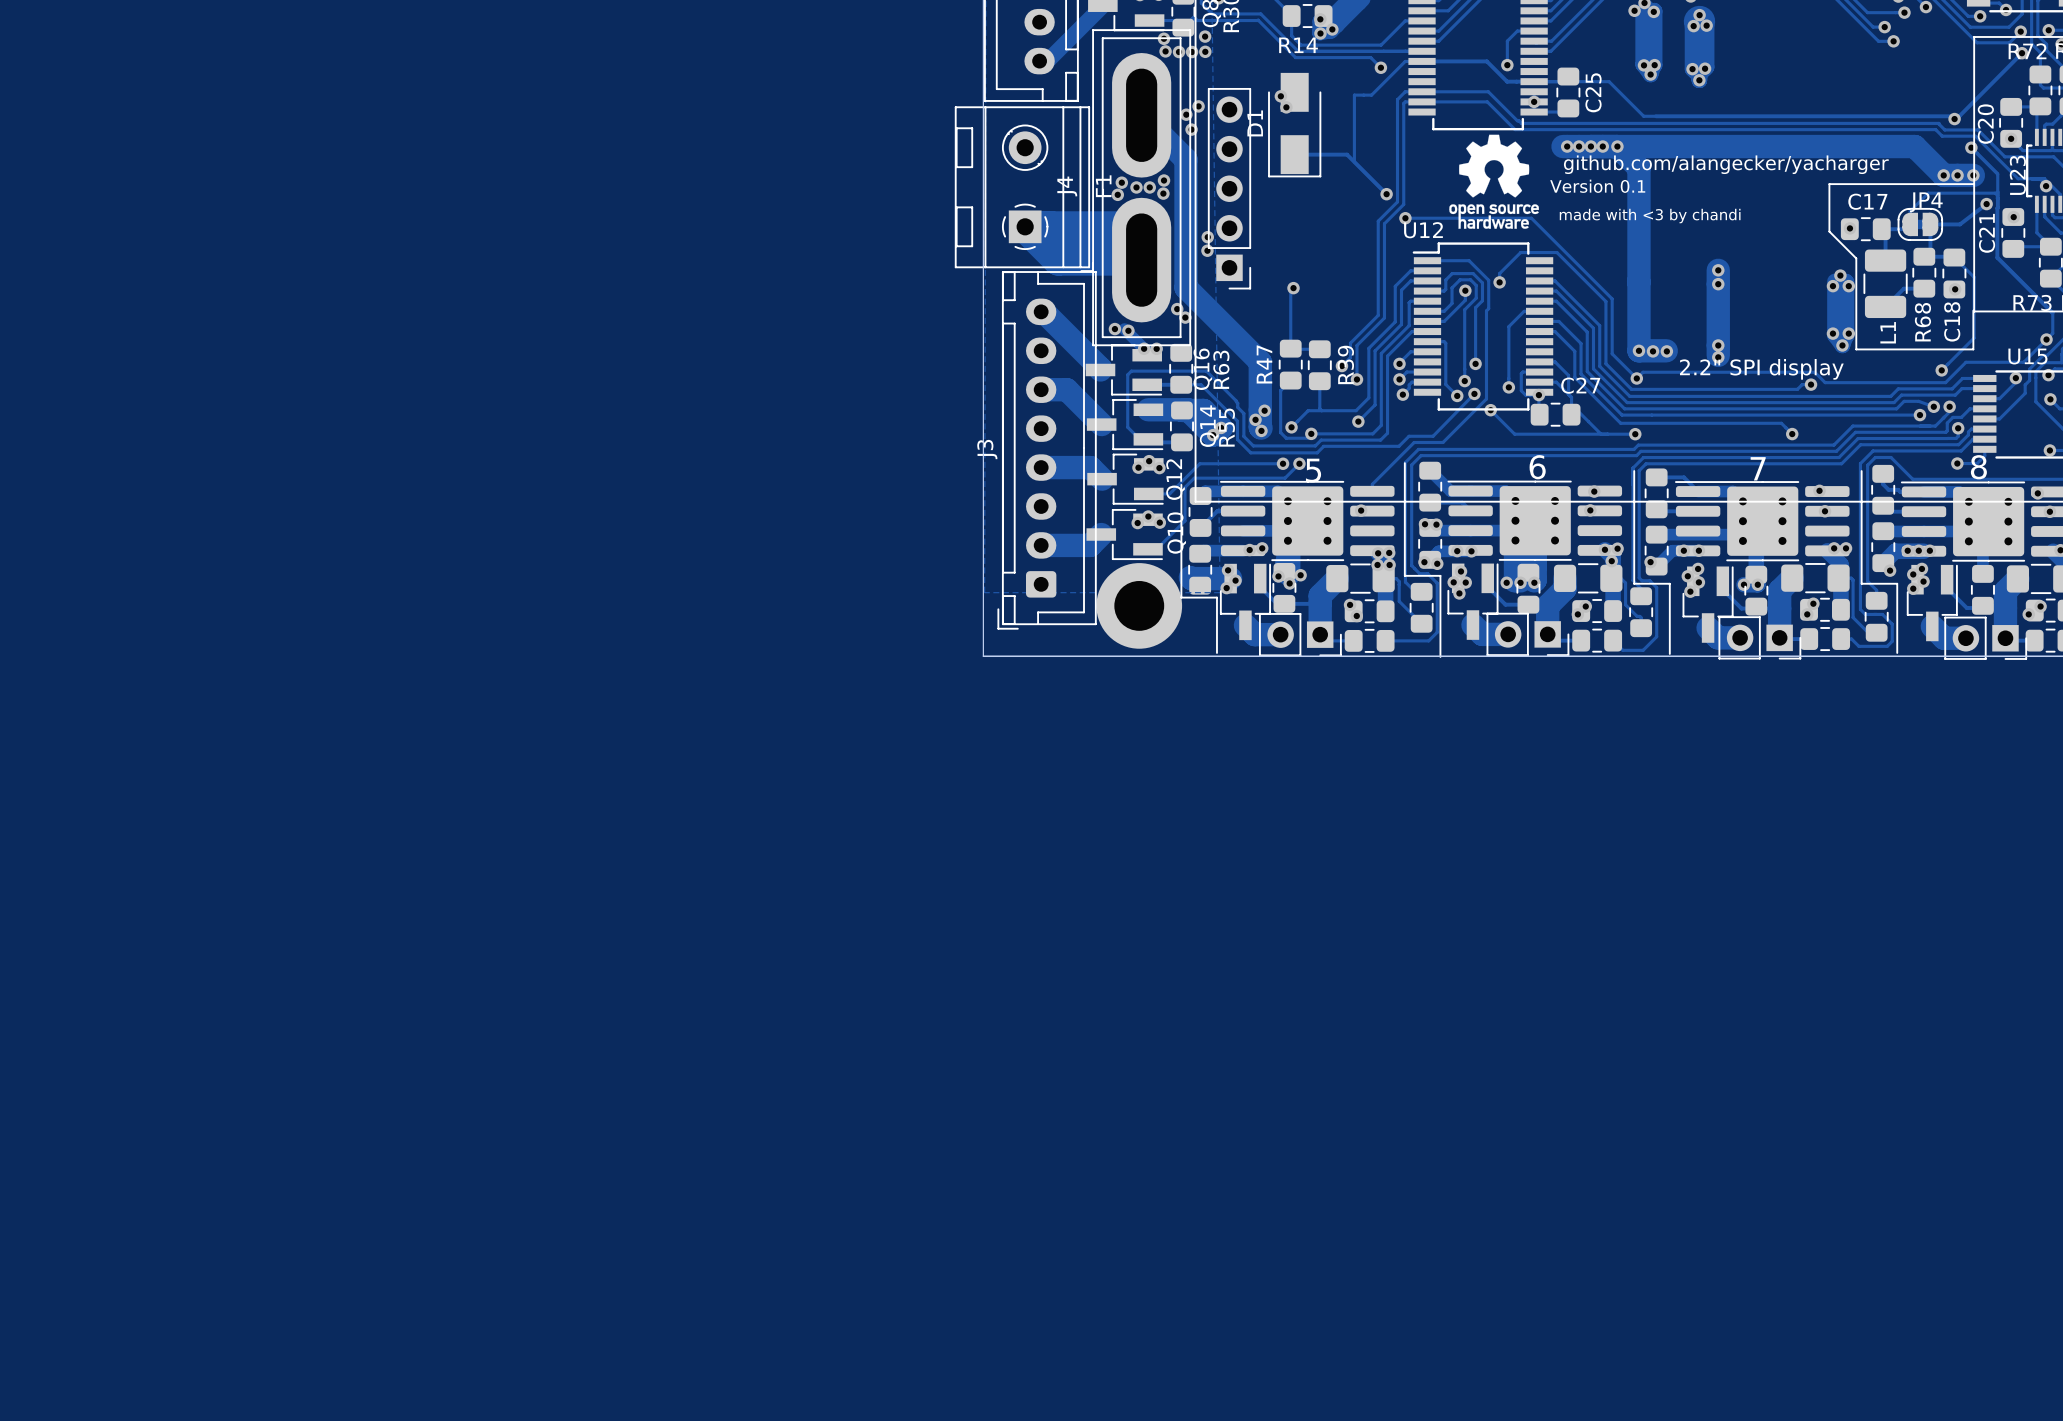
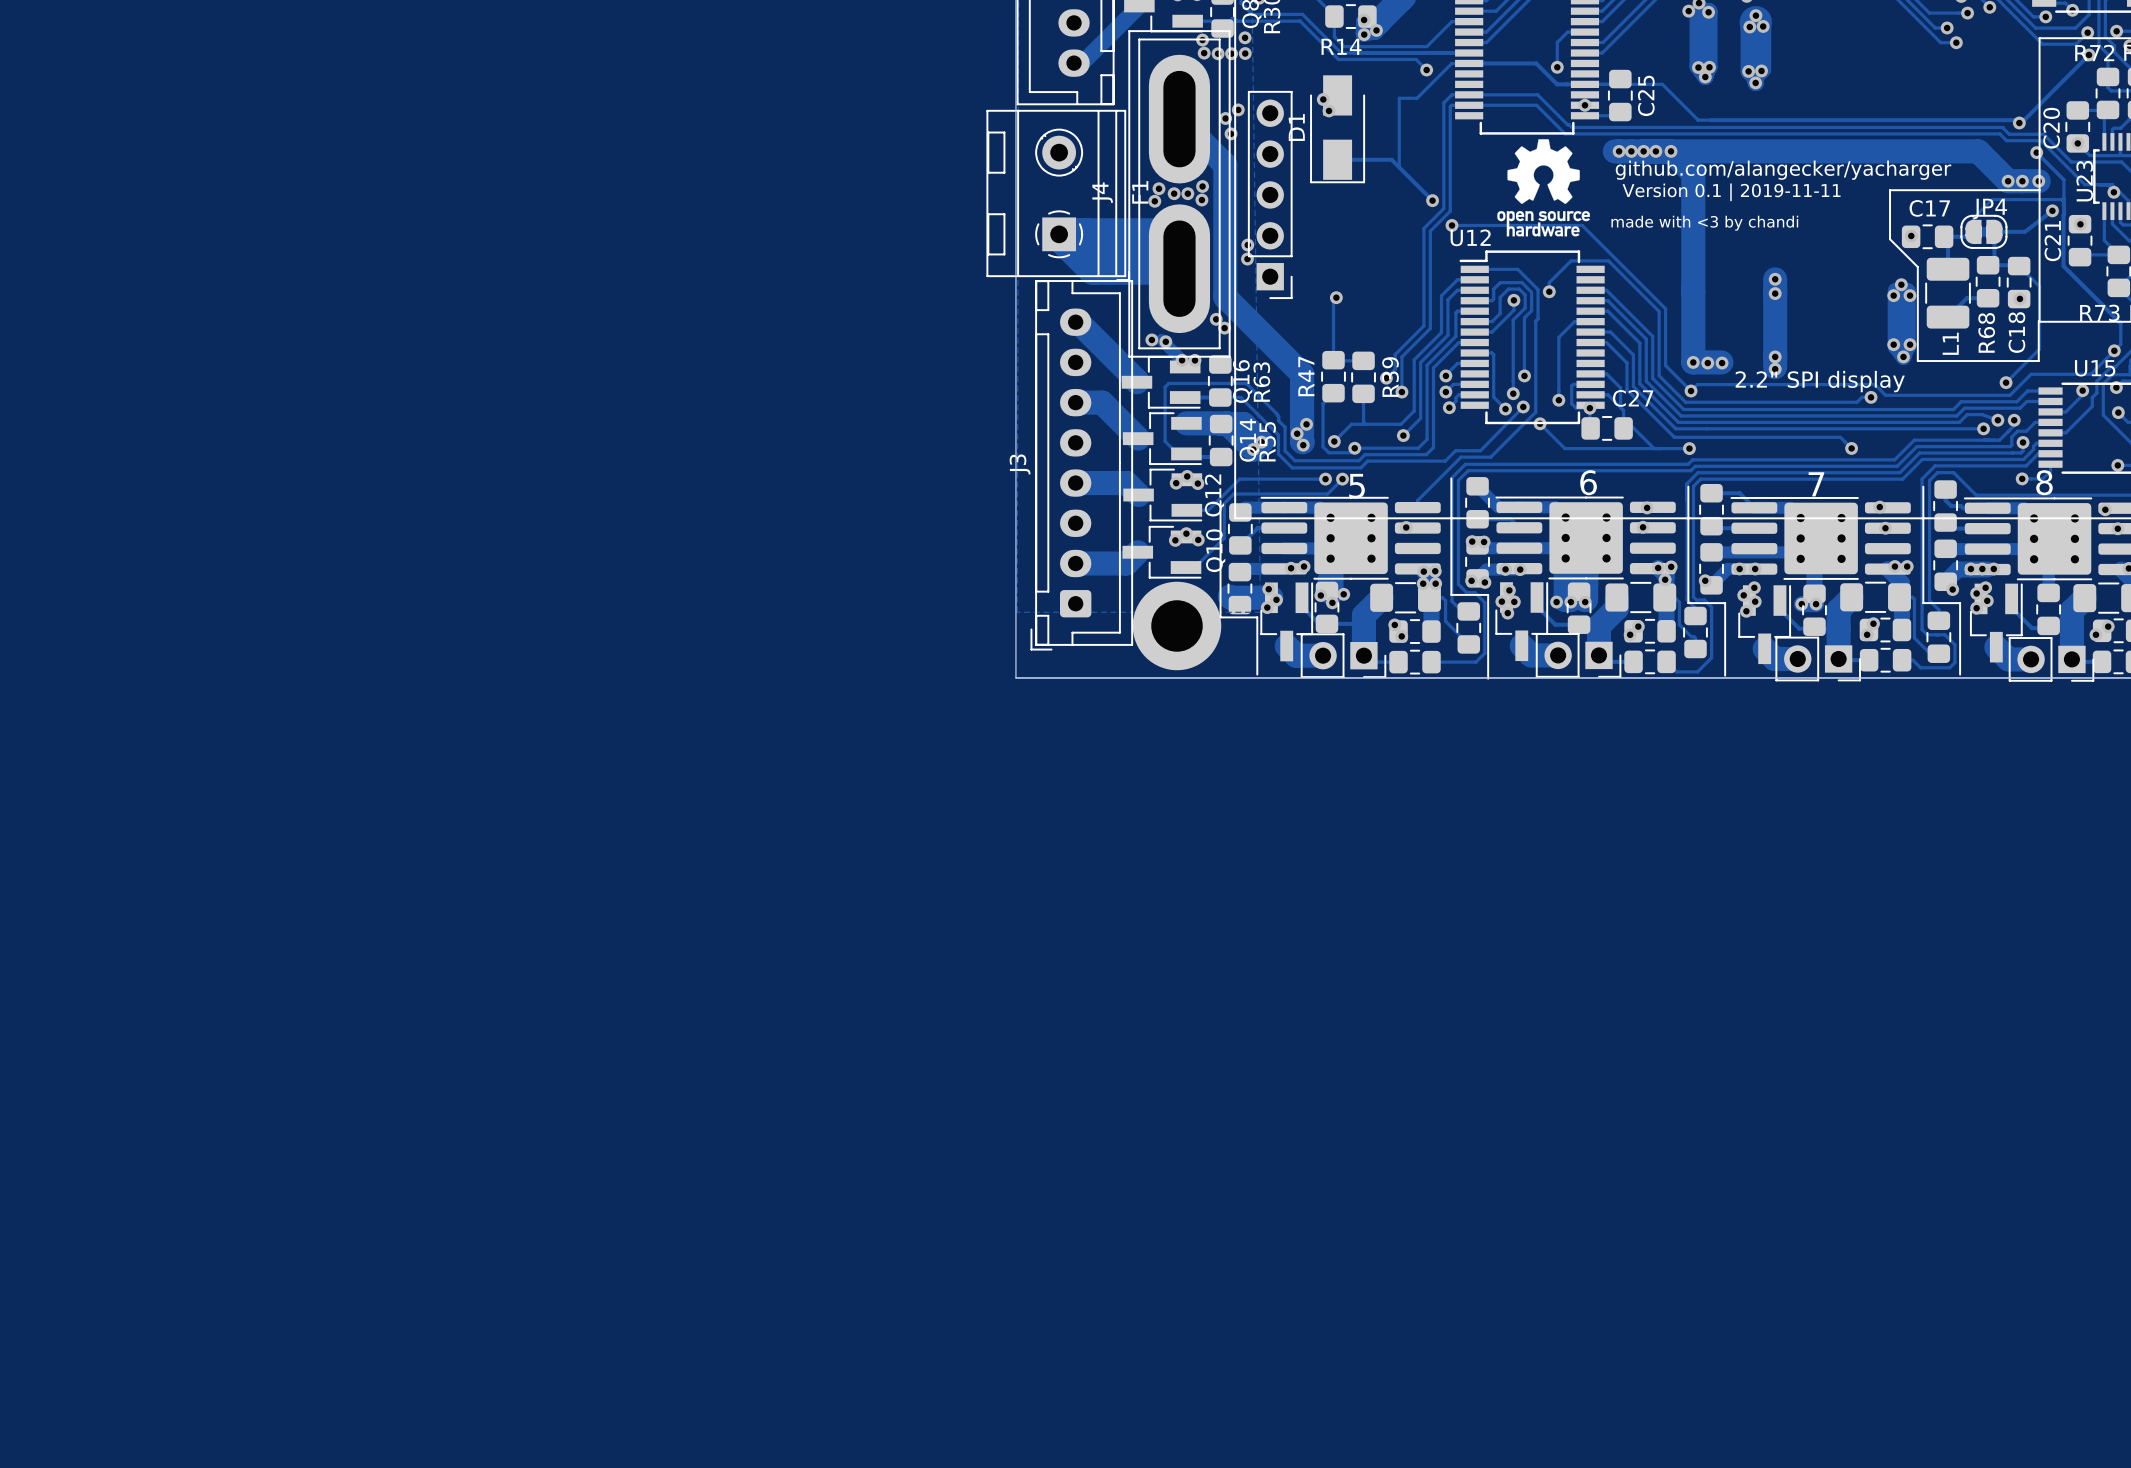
text: Version 0.1 (1597, 186) -> Version 0.1 | 2019-11-11 (1731, 192)

